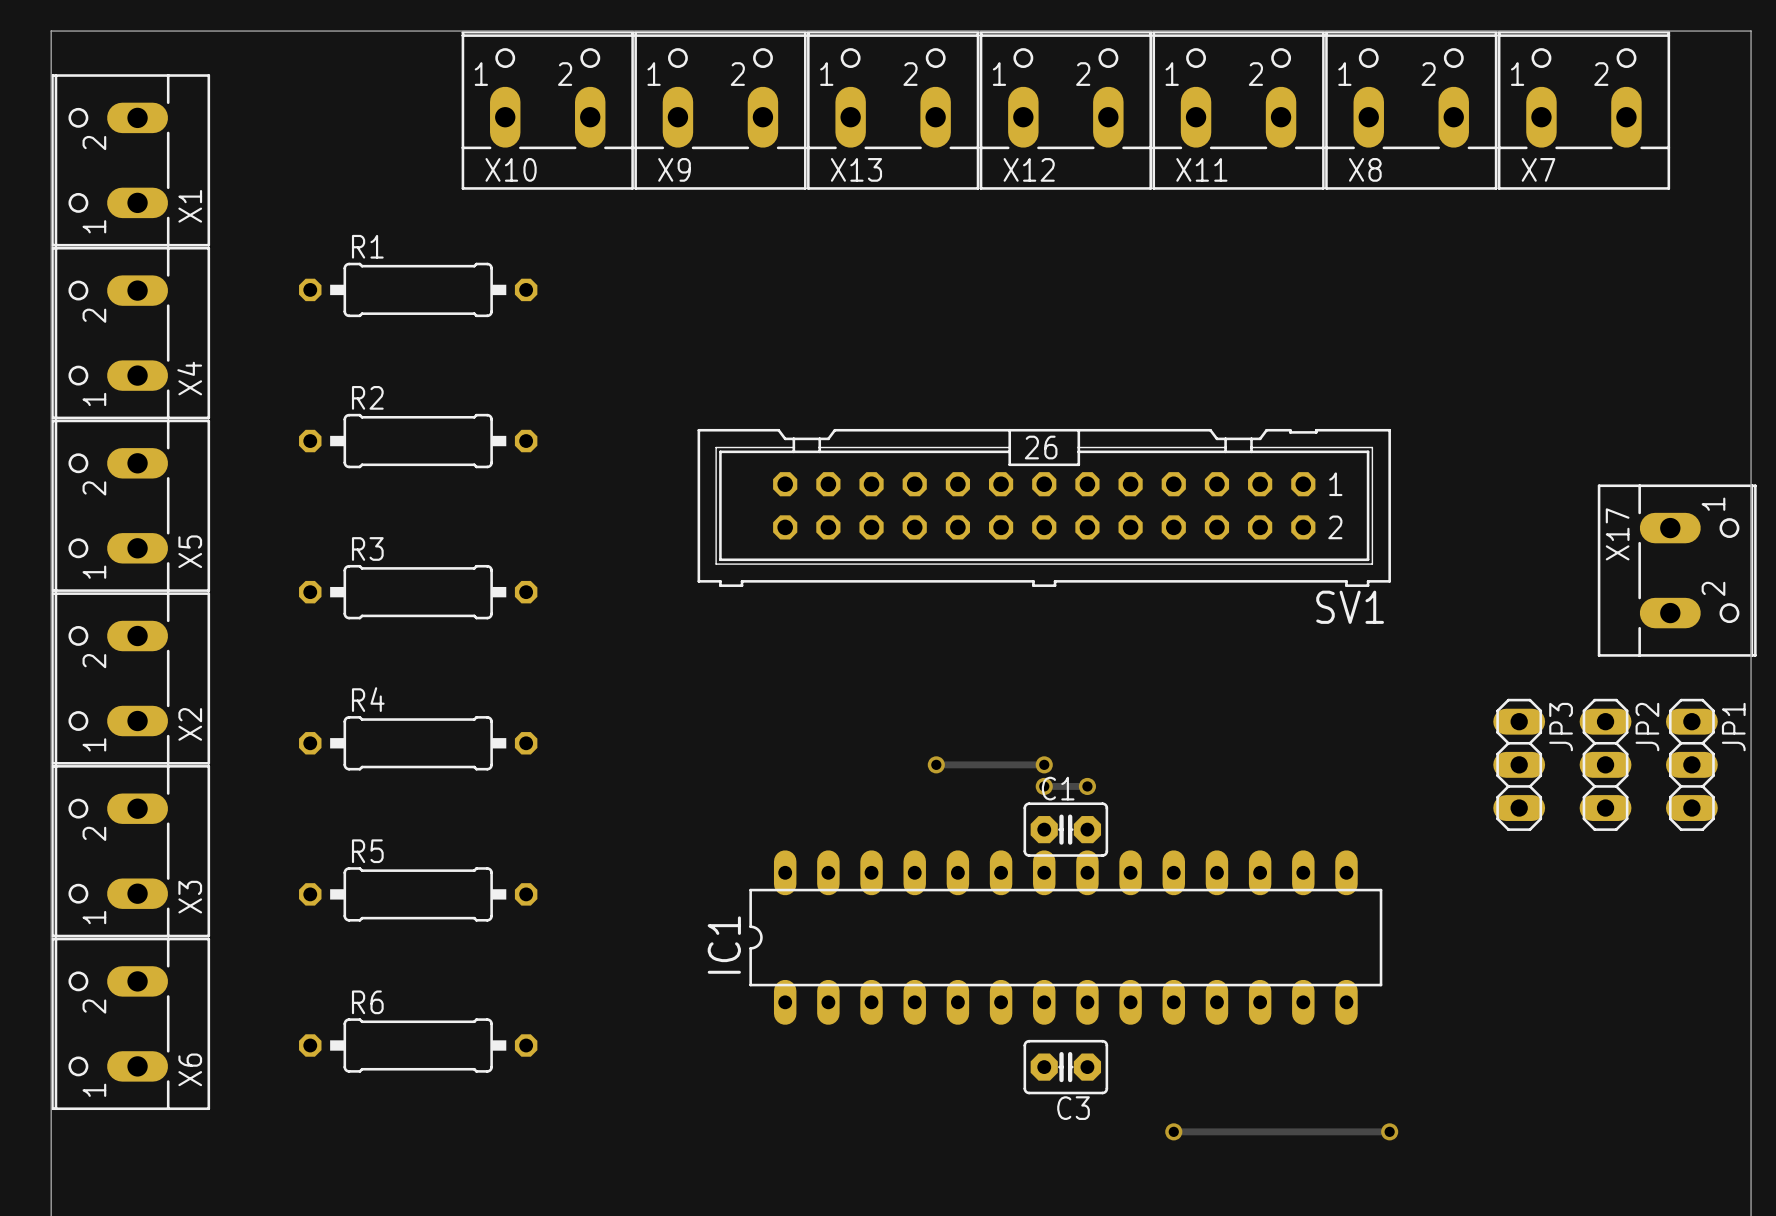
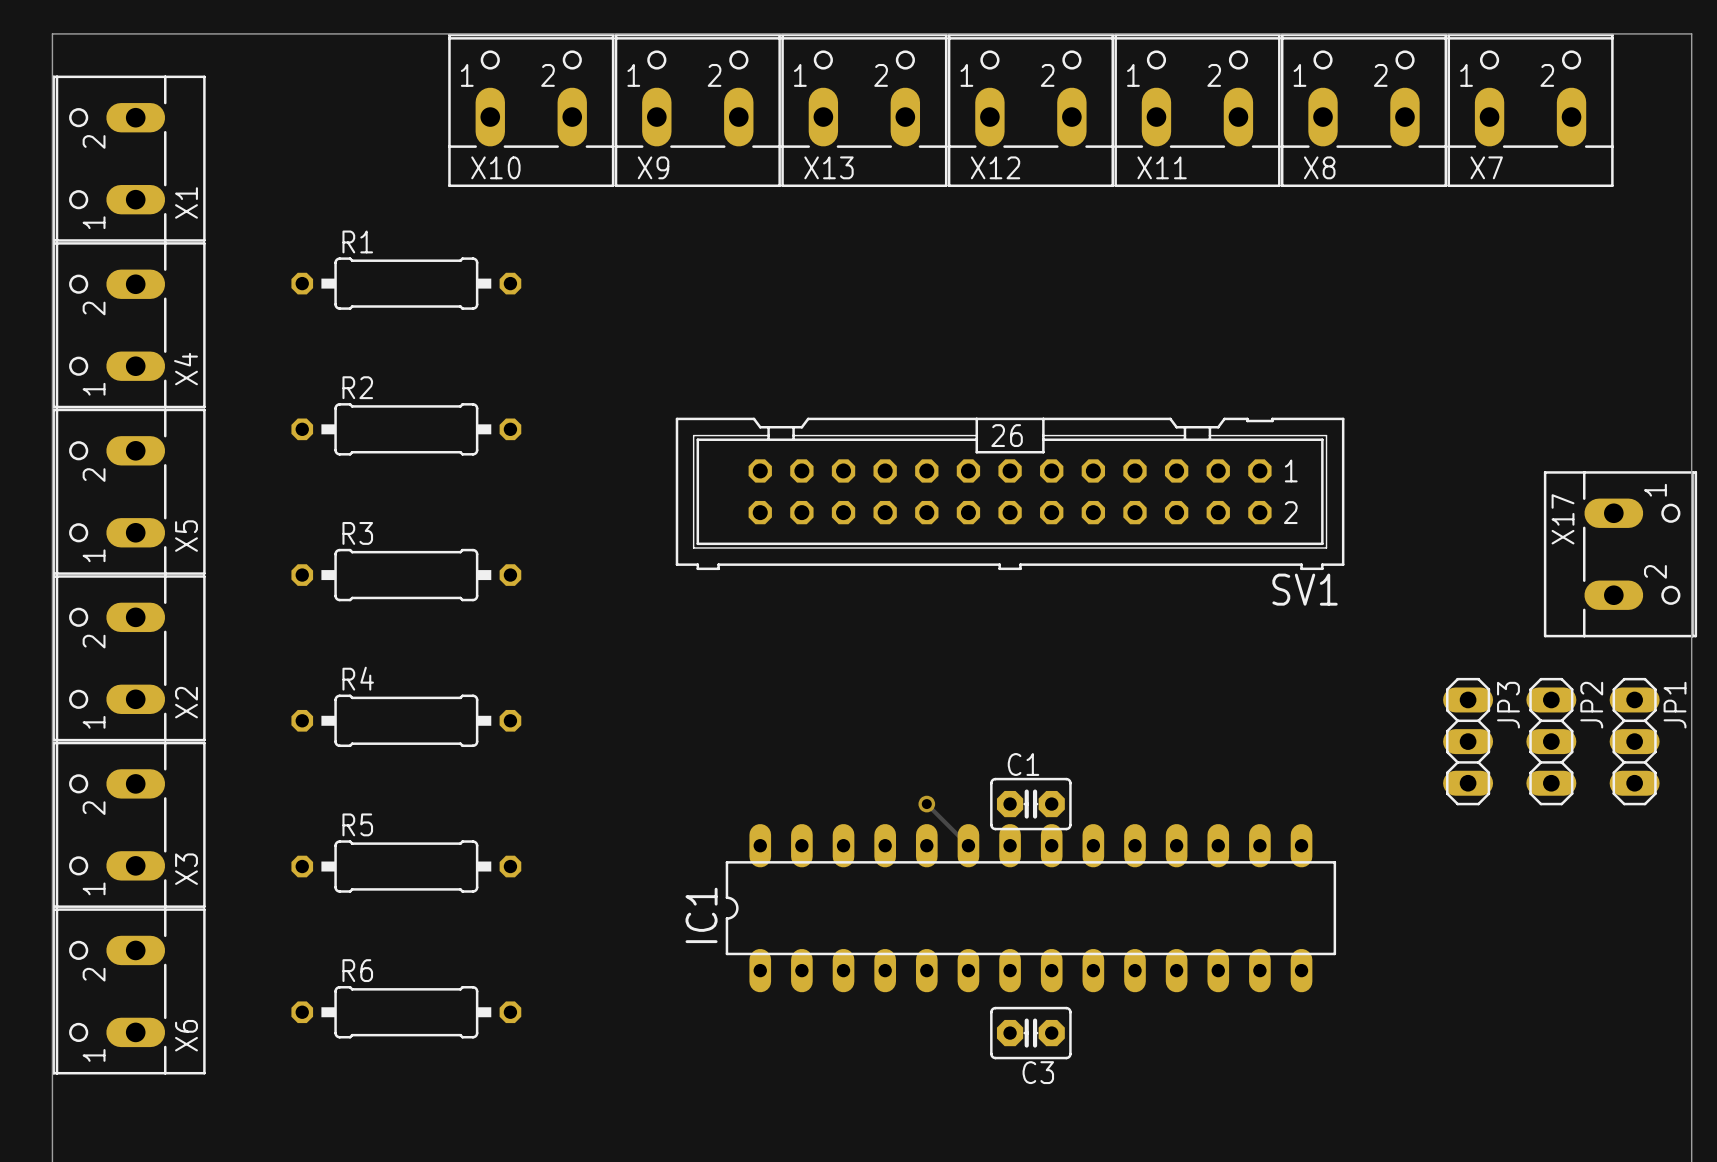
track: (936, 764) (1044, 764) -> none
via: (936, 764) -> none
via: (1044, 764) -> none
track: (1044, 786) (1087, 786) -> none
via: (1044, 786) -> none
via: (1087, 786) -> none
track: none -> (926, 804) (968, 845)
via: none -> (926, 804)
track: (1173, 1131) (1389, 1131) -> none
via: (1173, 1131) -> none
via: (1389, 1131) -> none

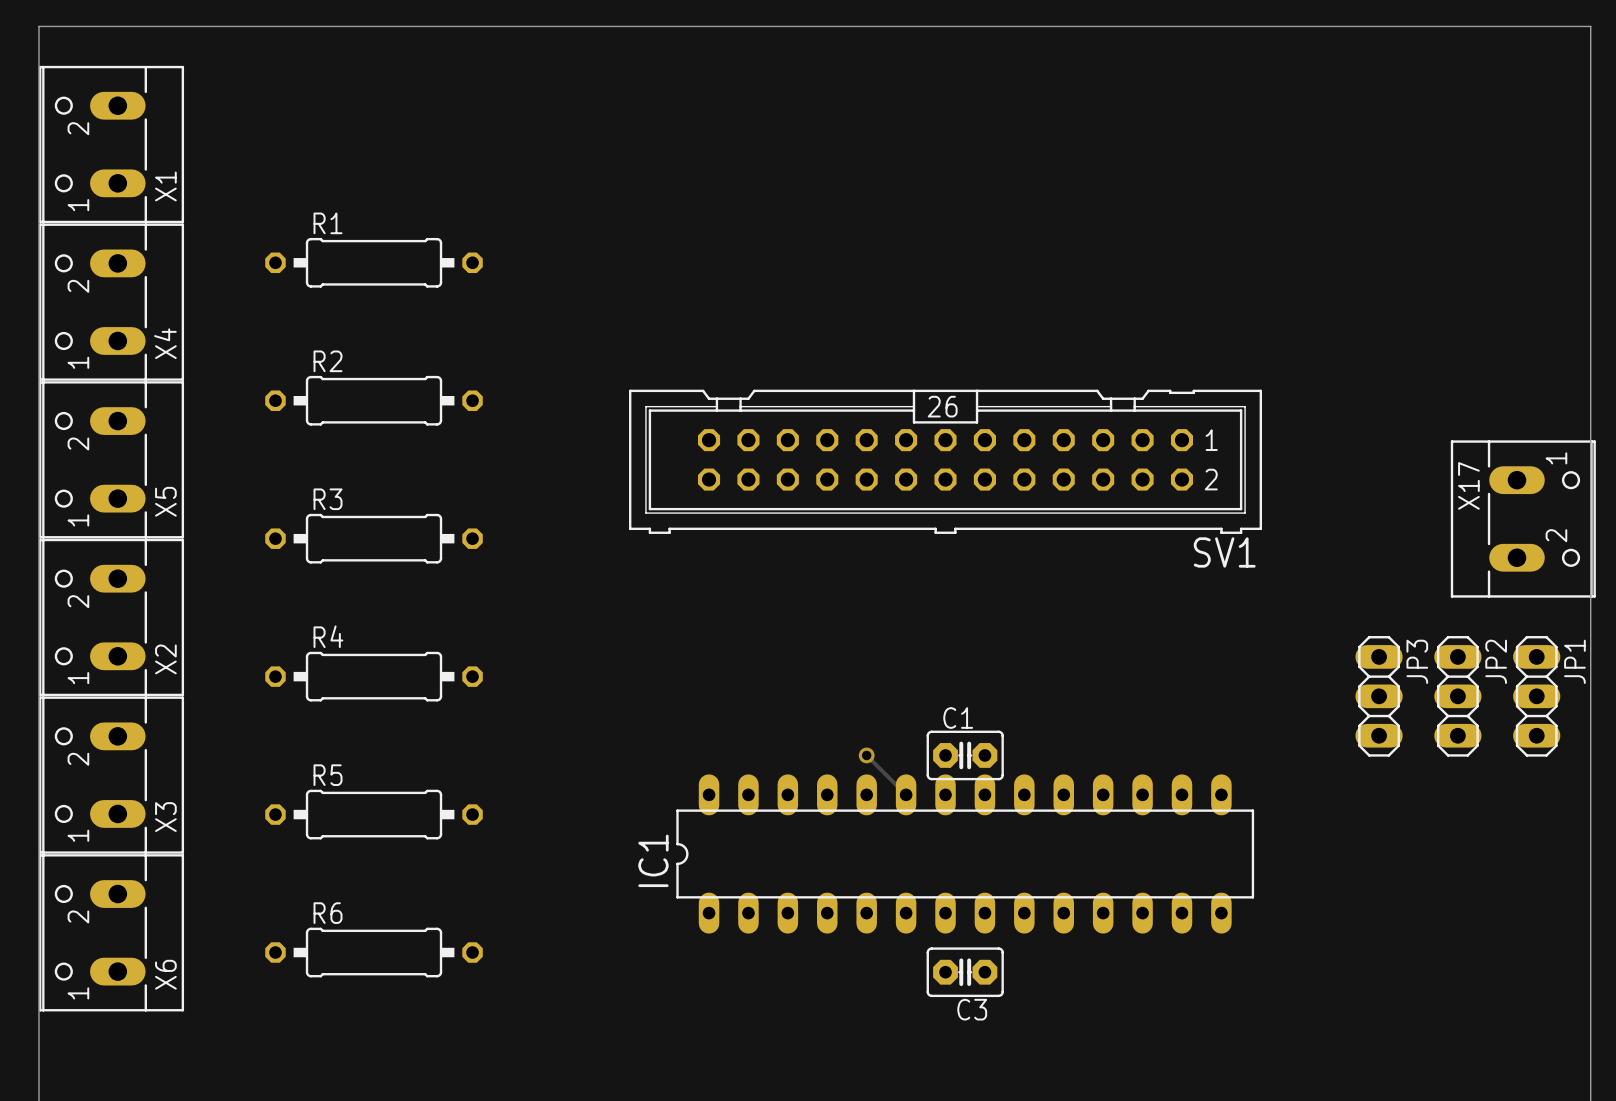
X10: (531, 110) -> none
X9: (697, 110) -> none
X13: (864, 110) -> none
X12: (1030, 110) -> none
X11: (1197, 110) -> none
X8: (1364, 110) -> none
X7: (1530, 110) -> none

